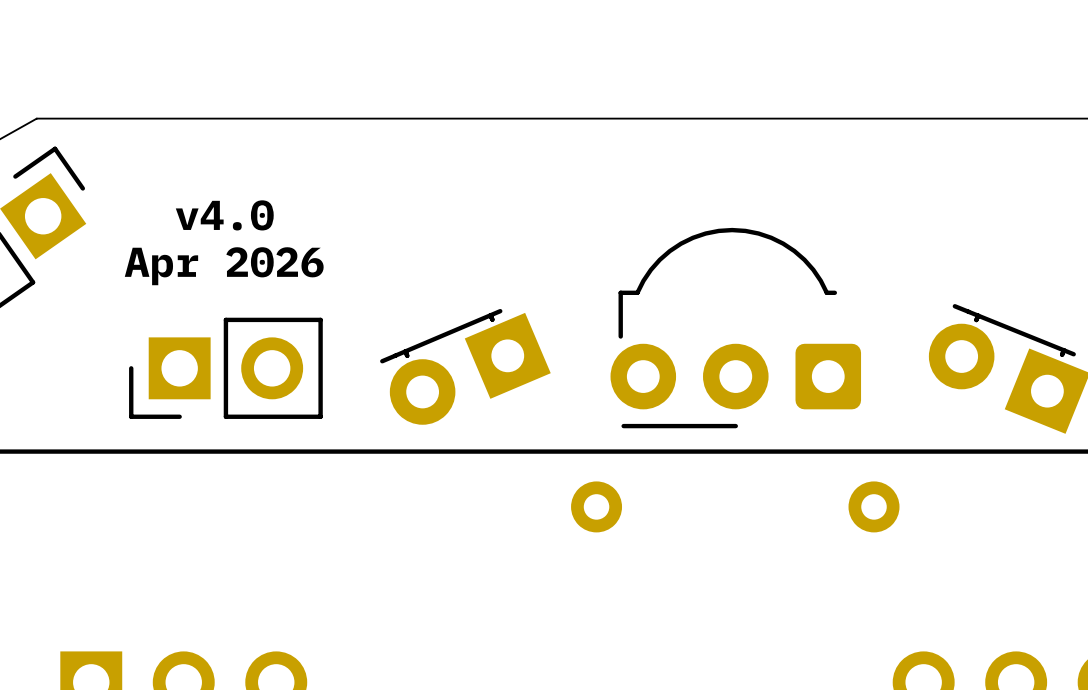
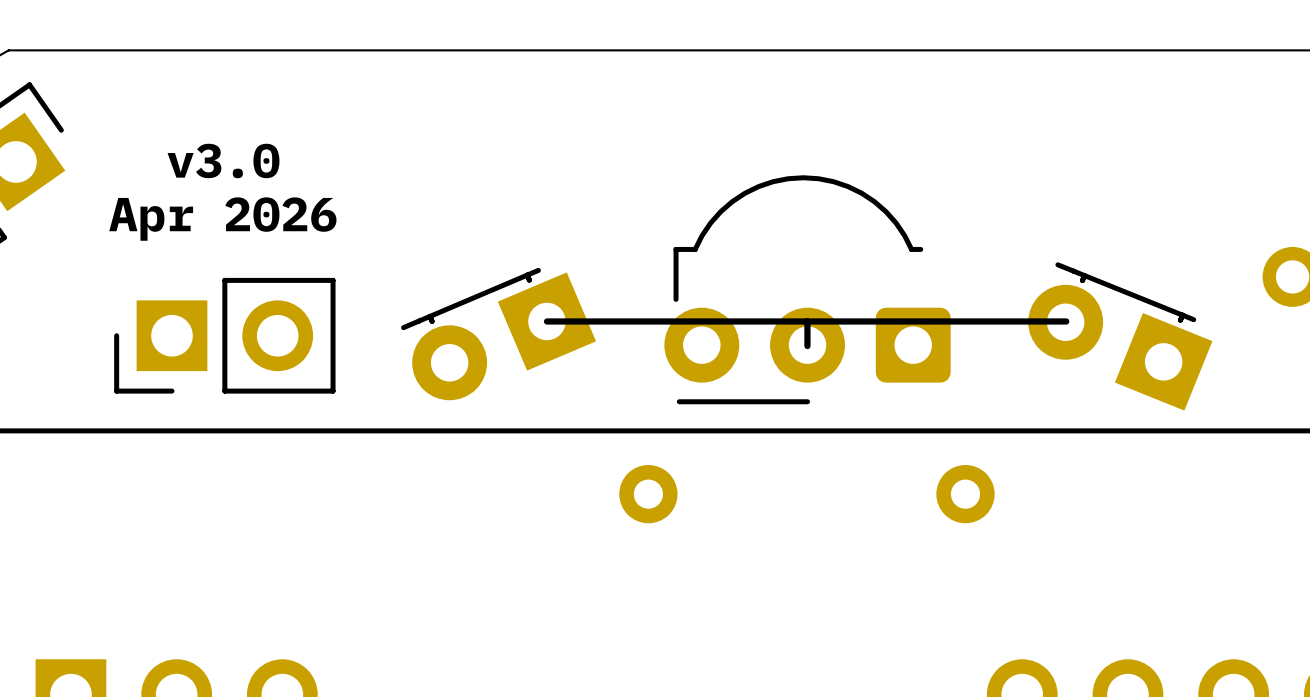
text: v4.0 (224, 215) -> v3.0 (223, 160)
line: none -> (546, 321) (1066, 321)
line: none -> (807, 321) (807, 346)

